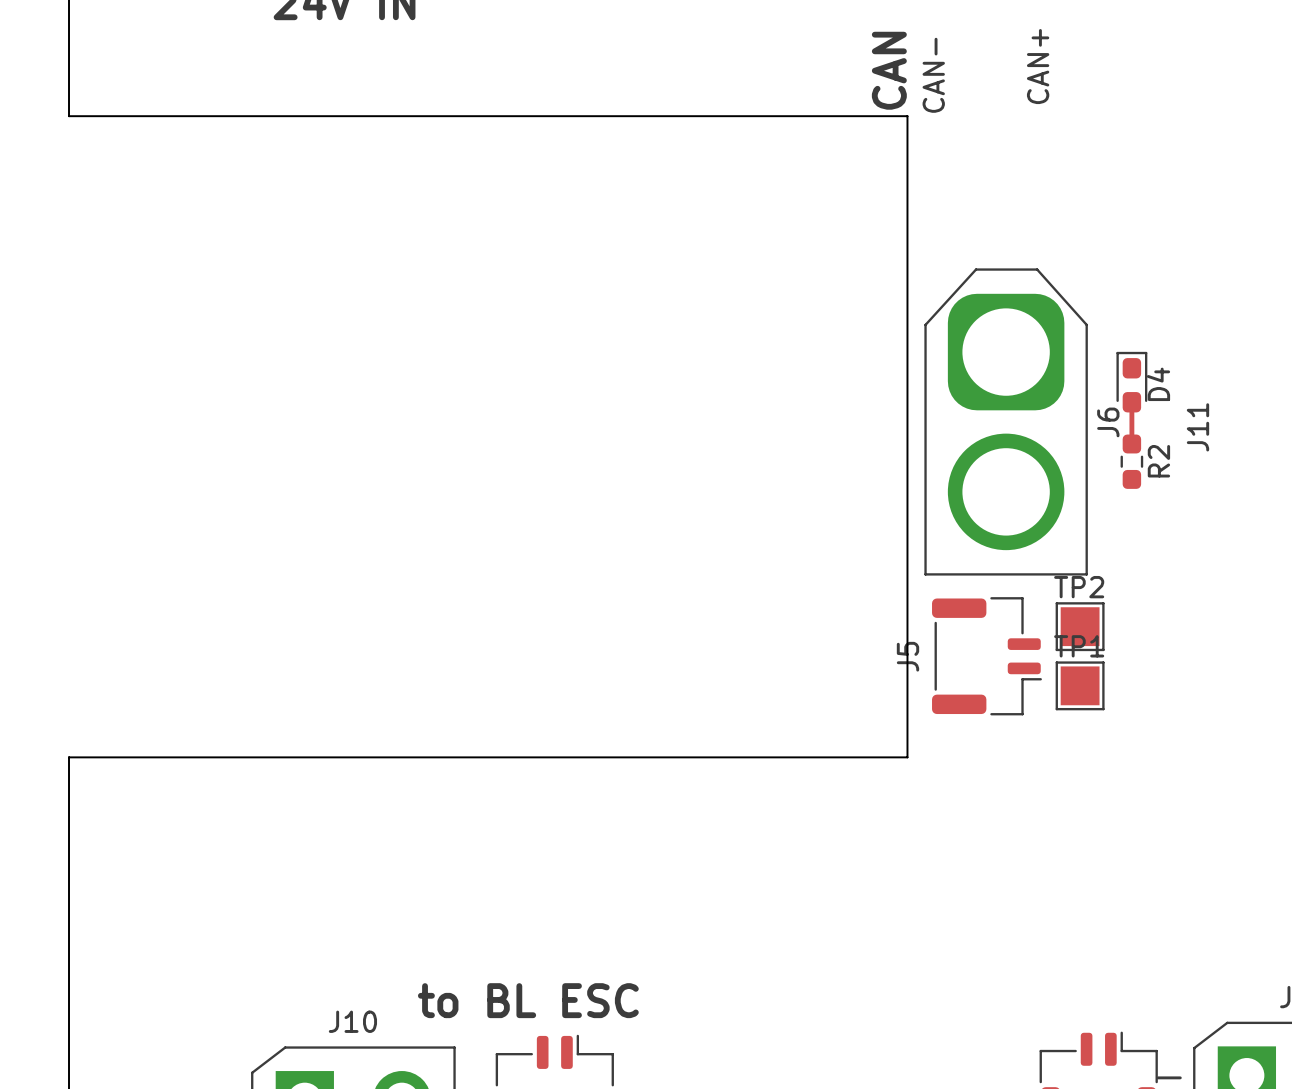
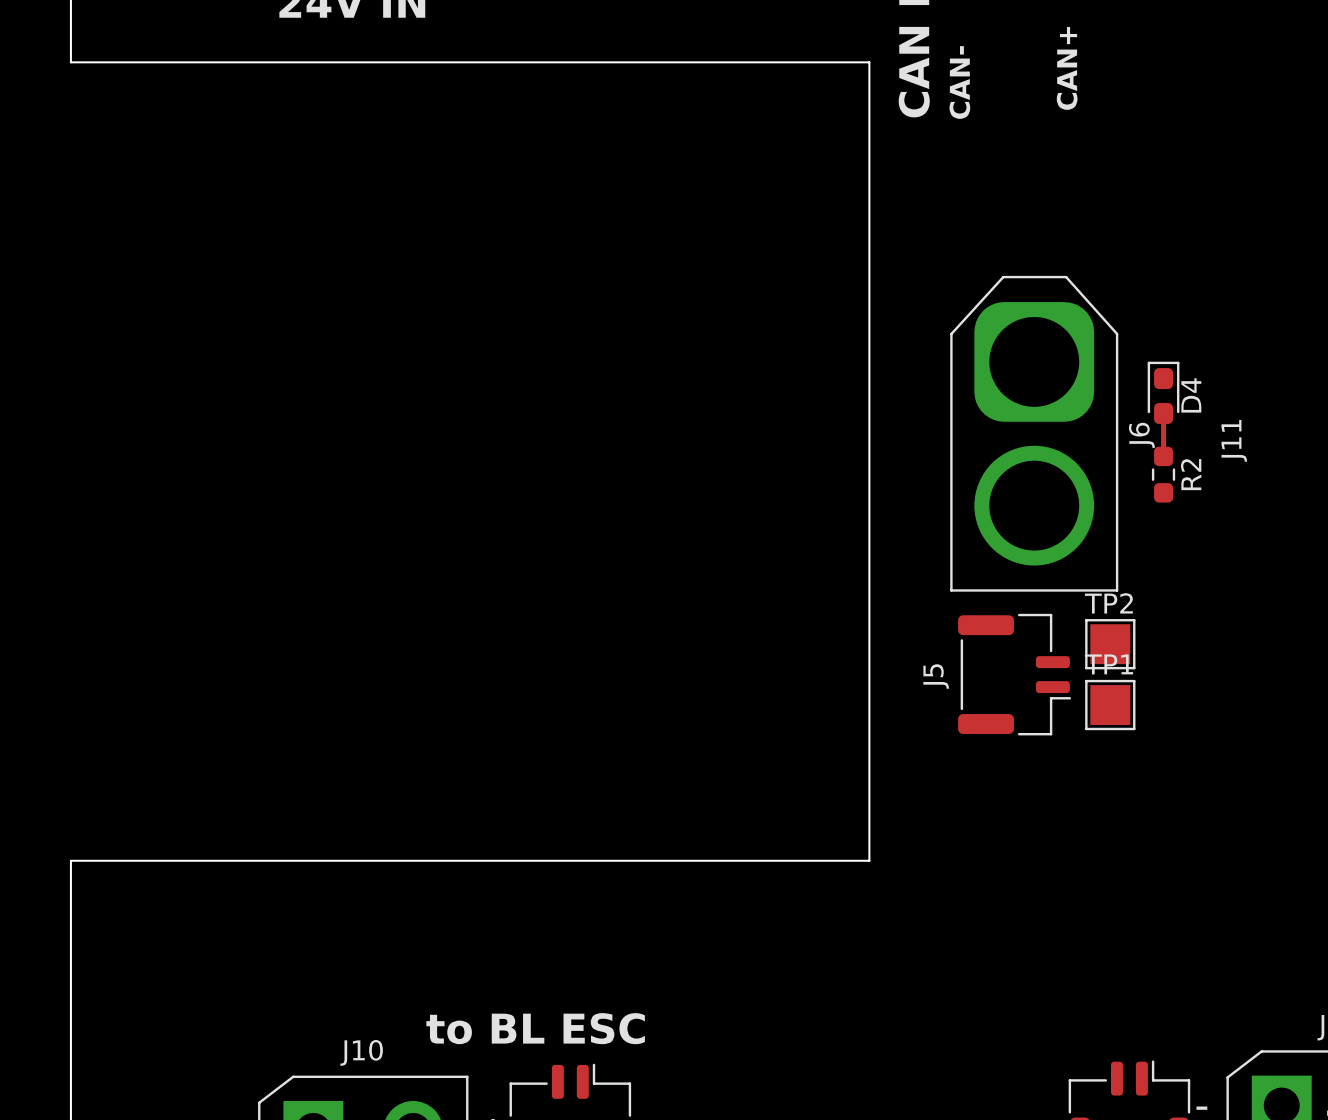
board edge: (69, 60) (69, 116) (907, 116) (907, 757) (69, 757) (69, 837) -> (70, 62) (869, 62) (869, 860) (70, 860)

